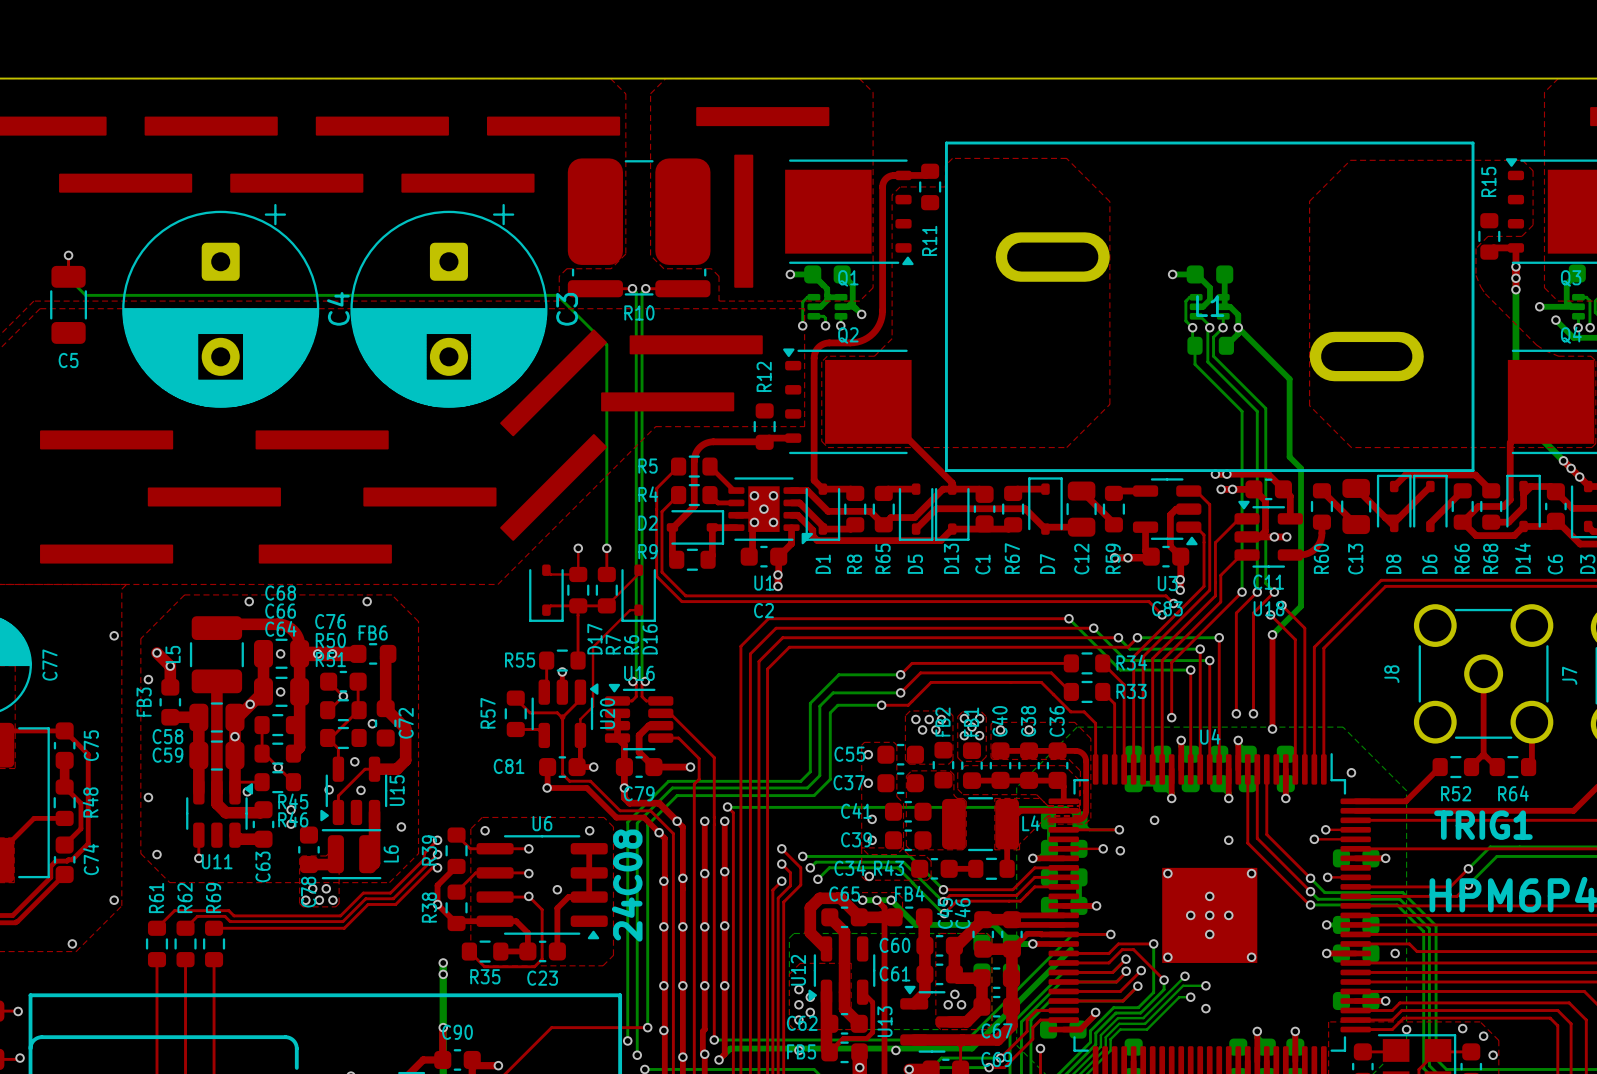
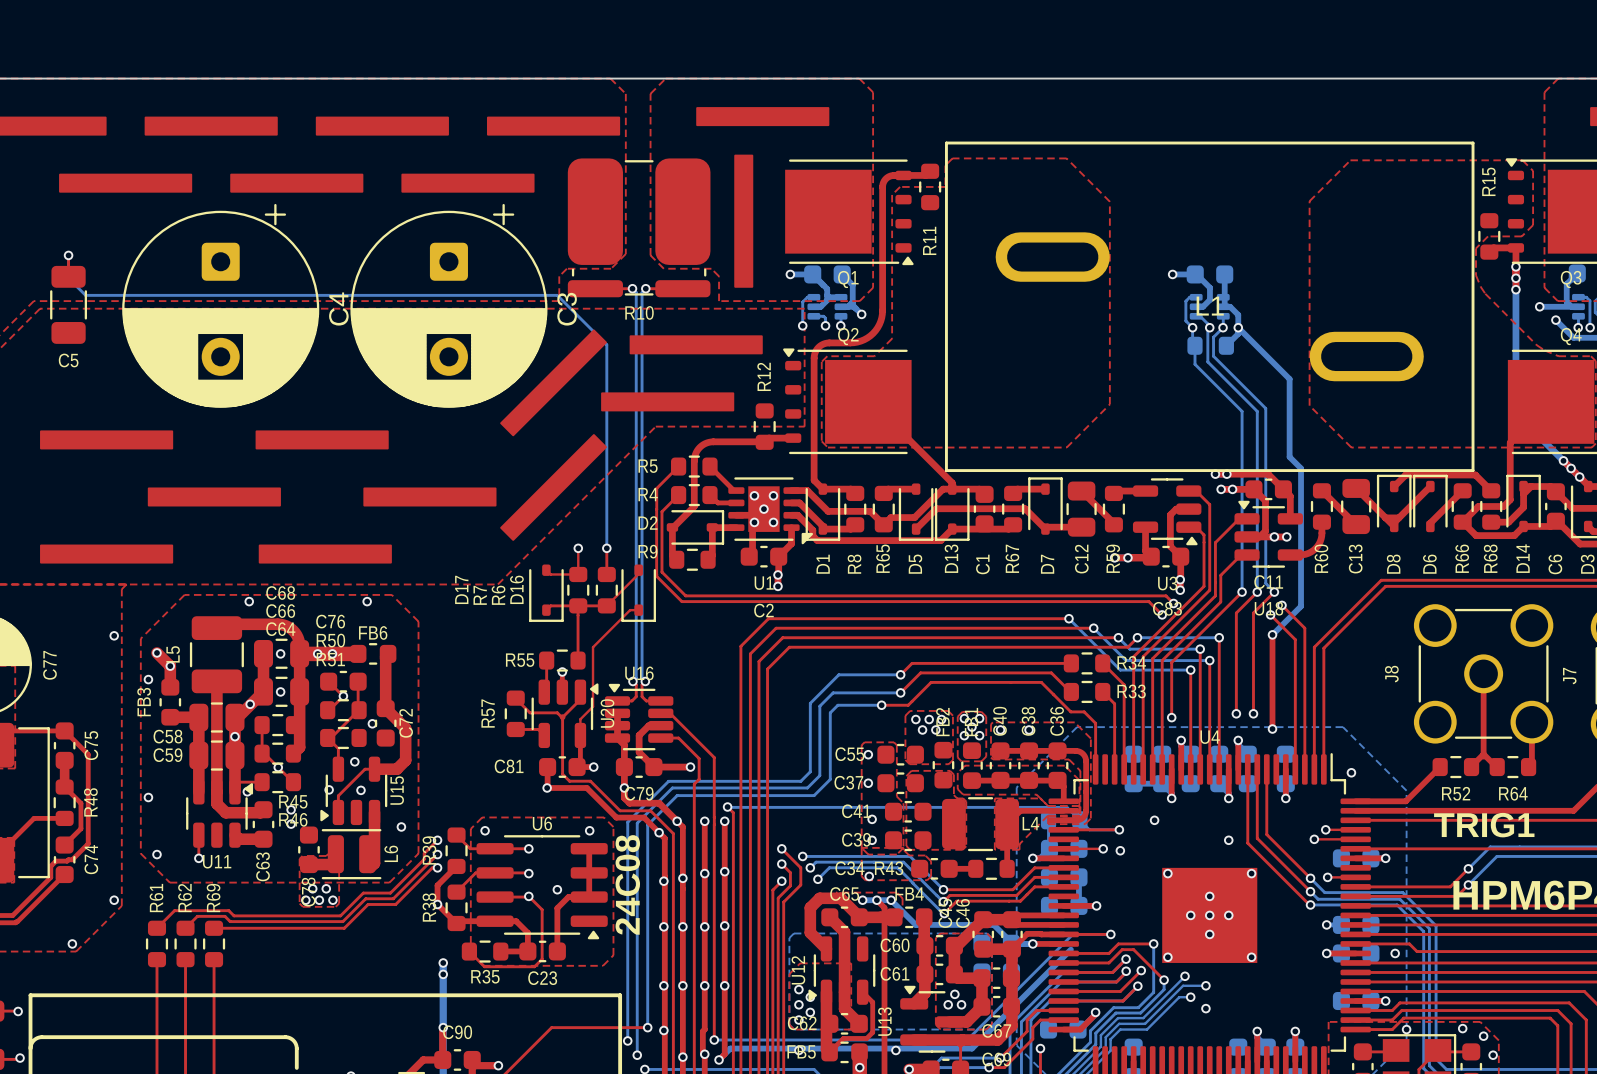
D17 name position: D17 (594, 639) -> D17 (461, 589)
D16 name position: D16 (650, 639) -> D16 (516, 589)
R7 name position: R7 (613, 644) -> R7 (480, 595)
R6 name position: R6 (631, 644) -> R6 (498, 595)

